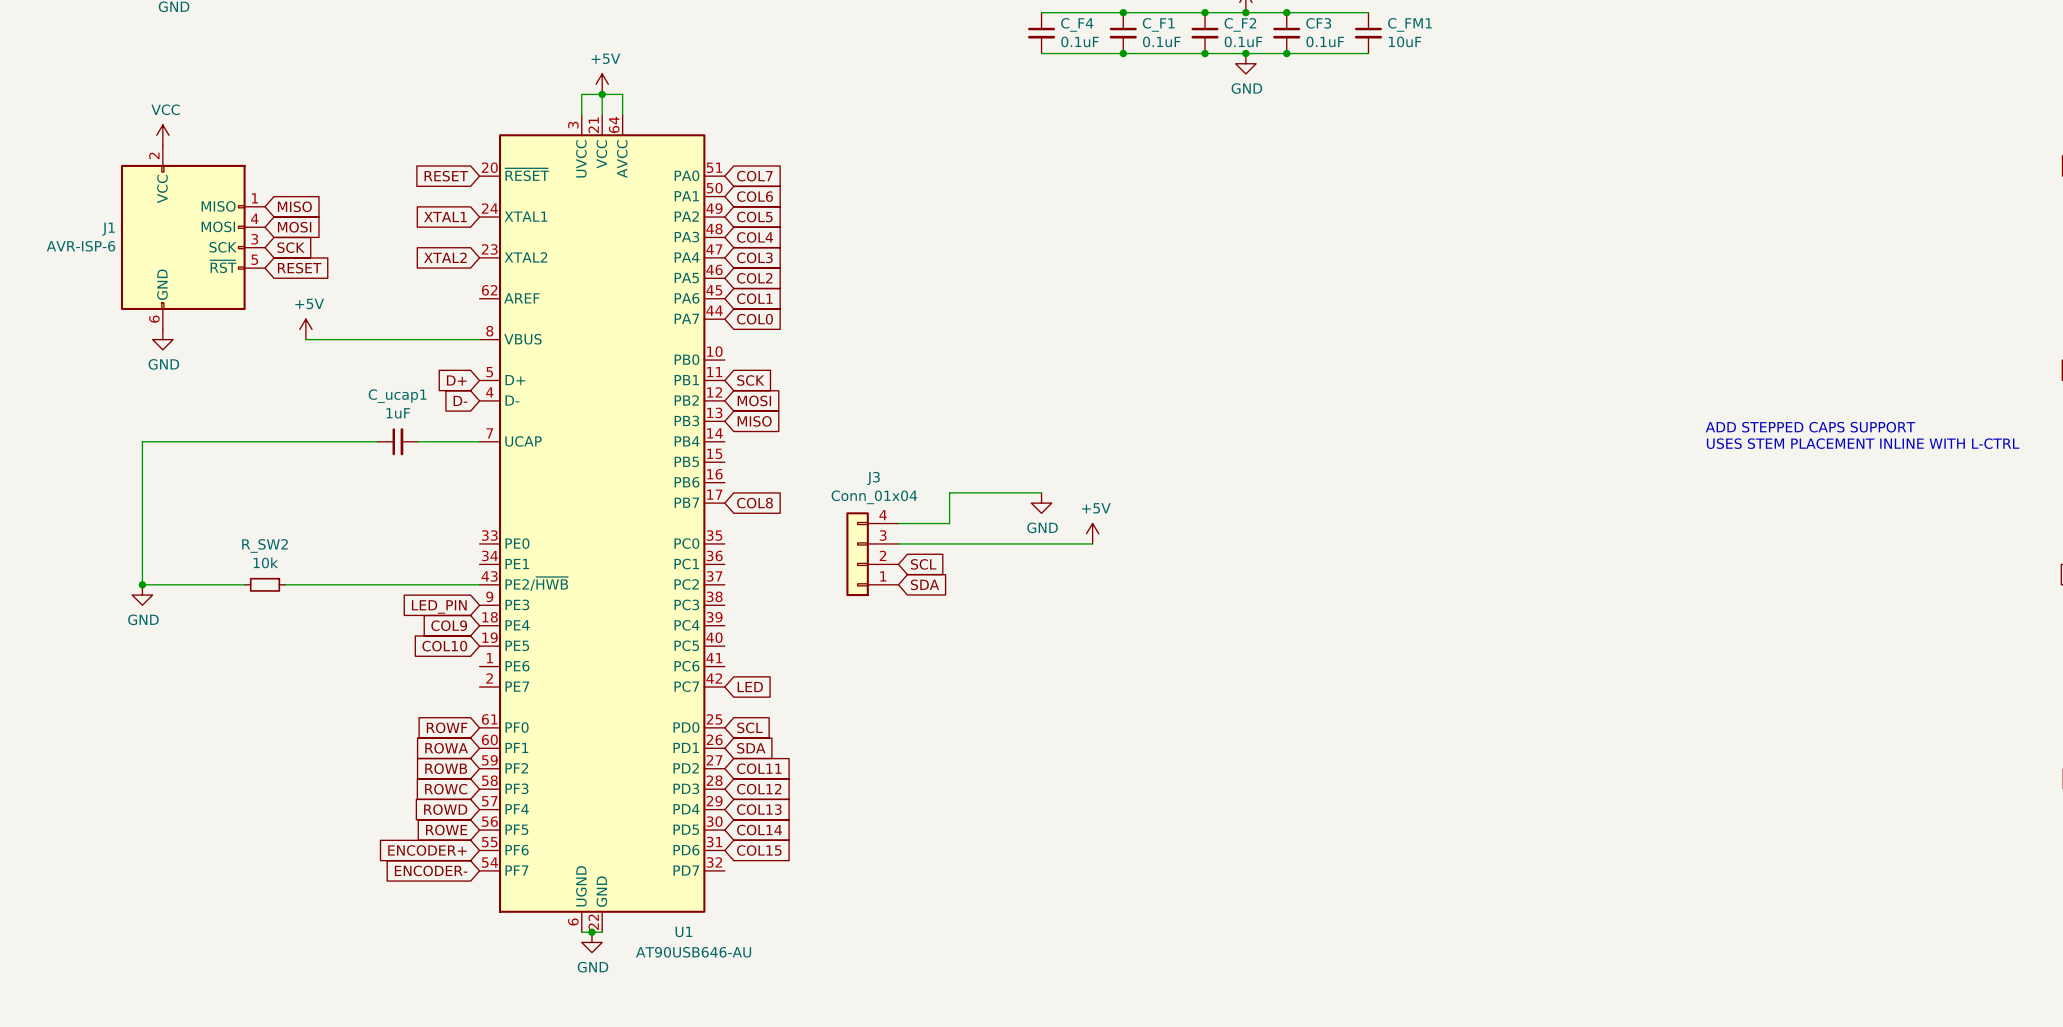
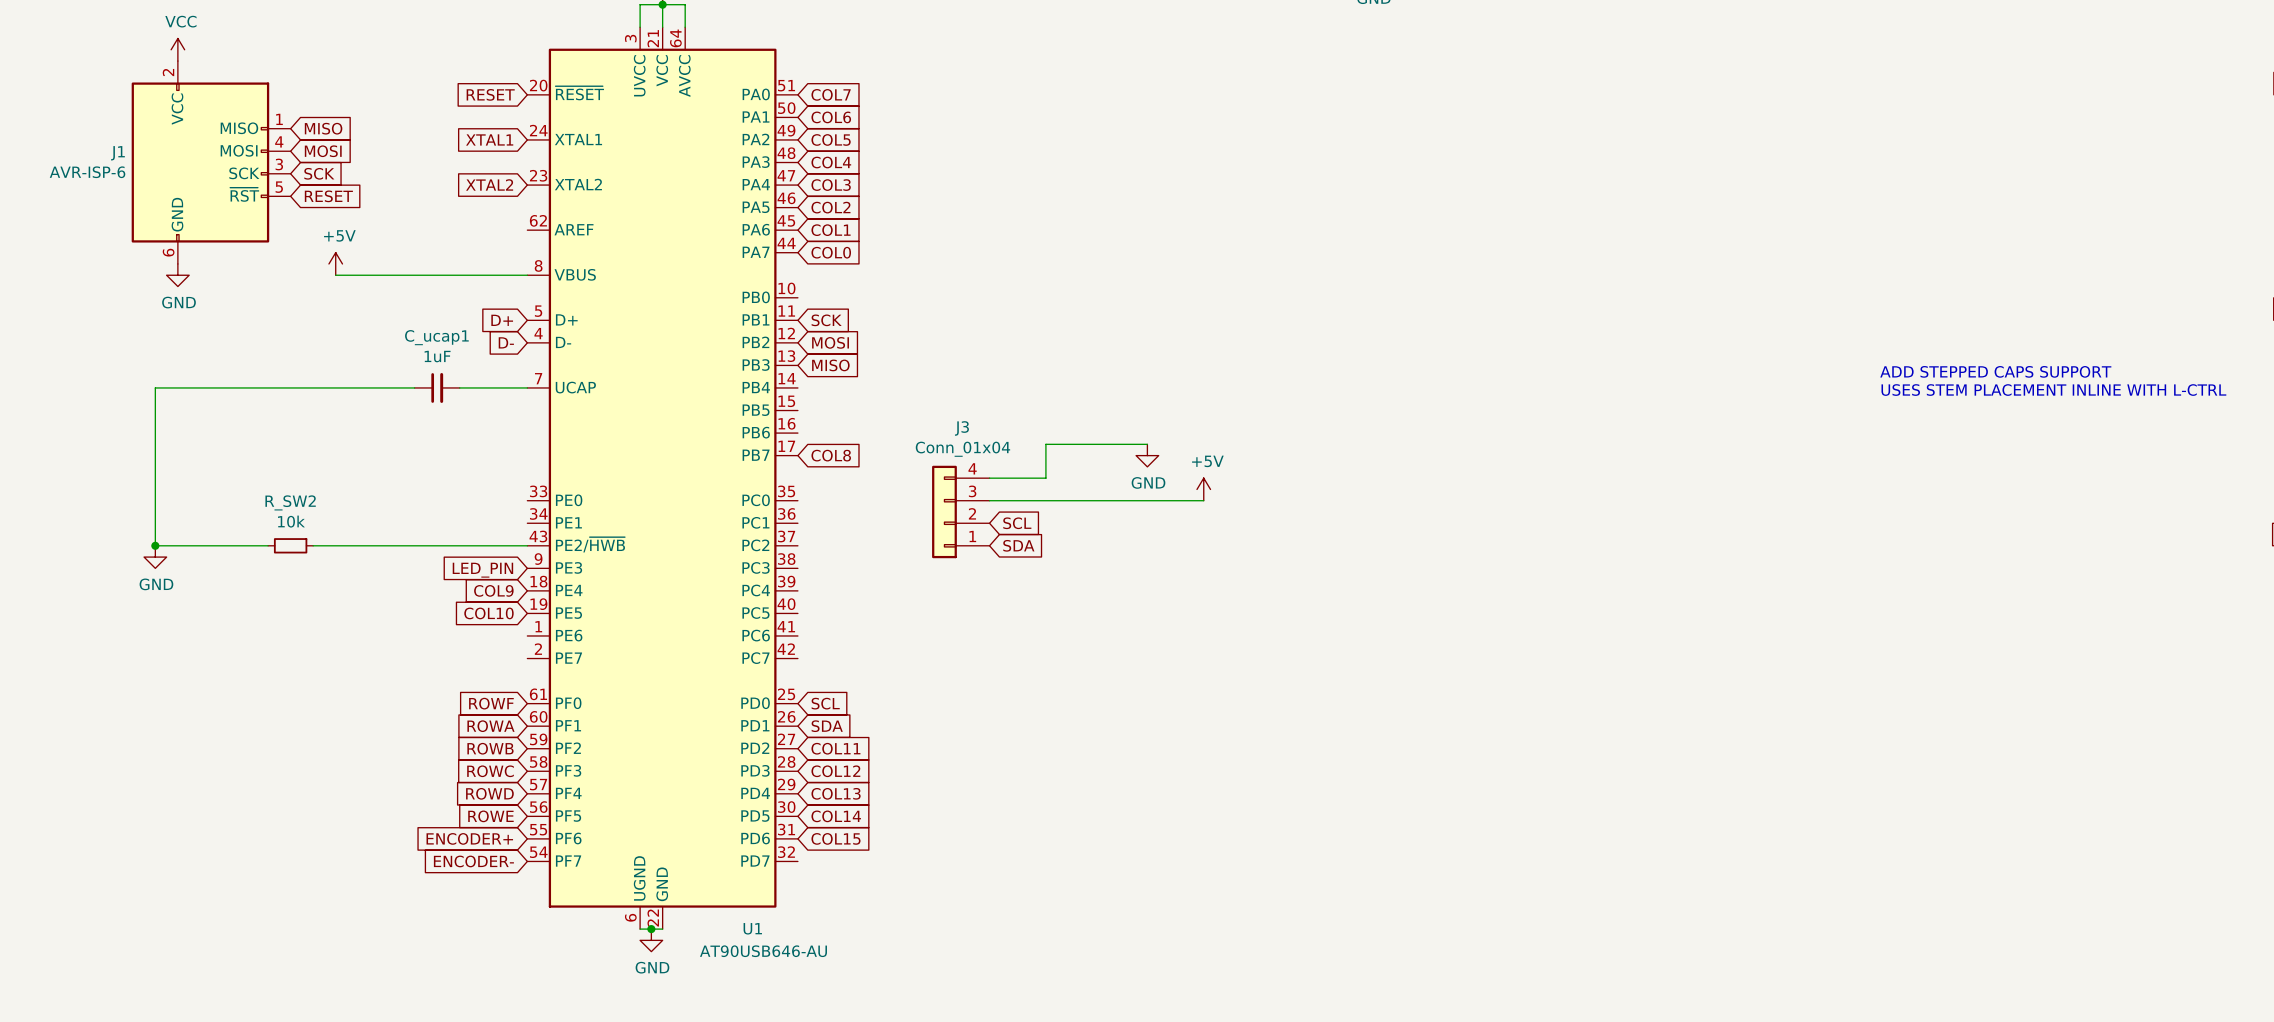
global label: LED (750, 687) -> none

